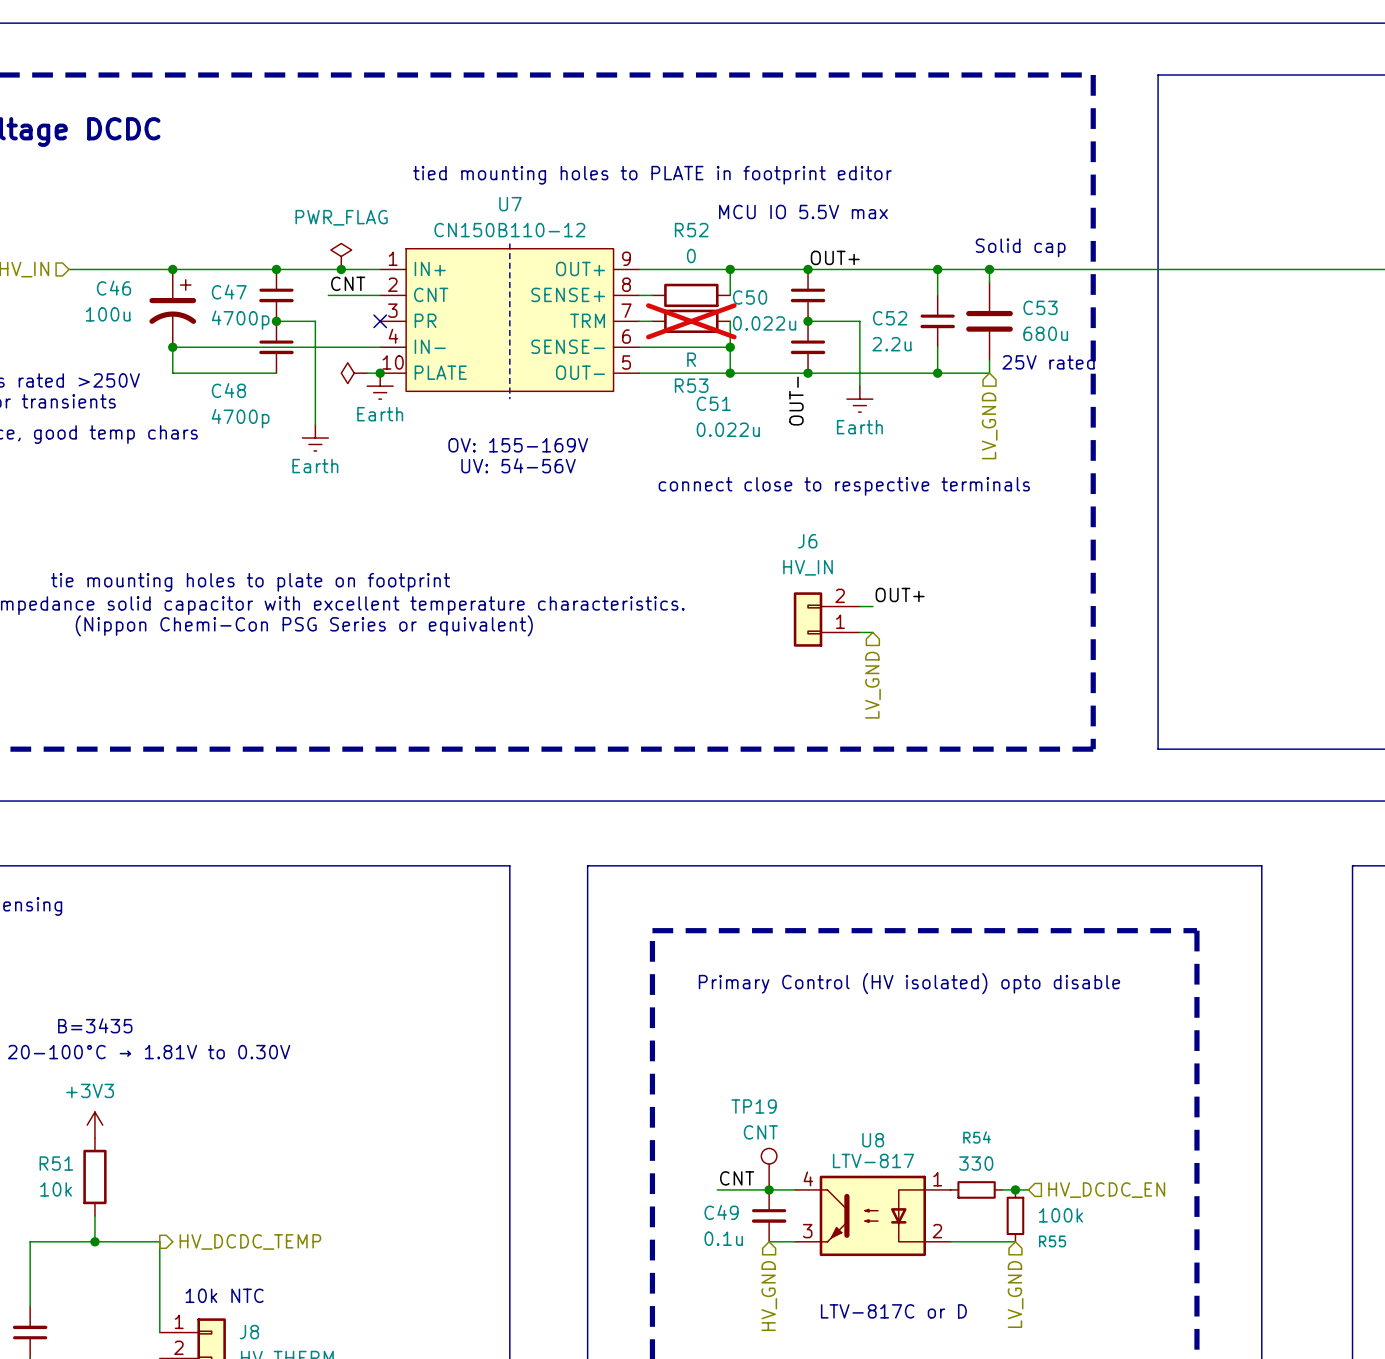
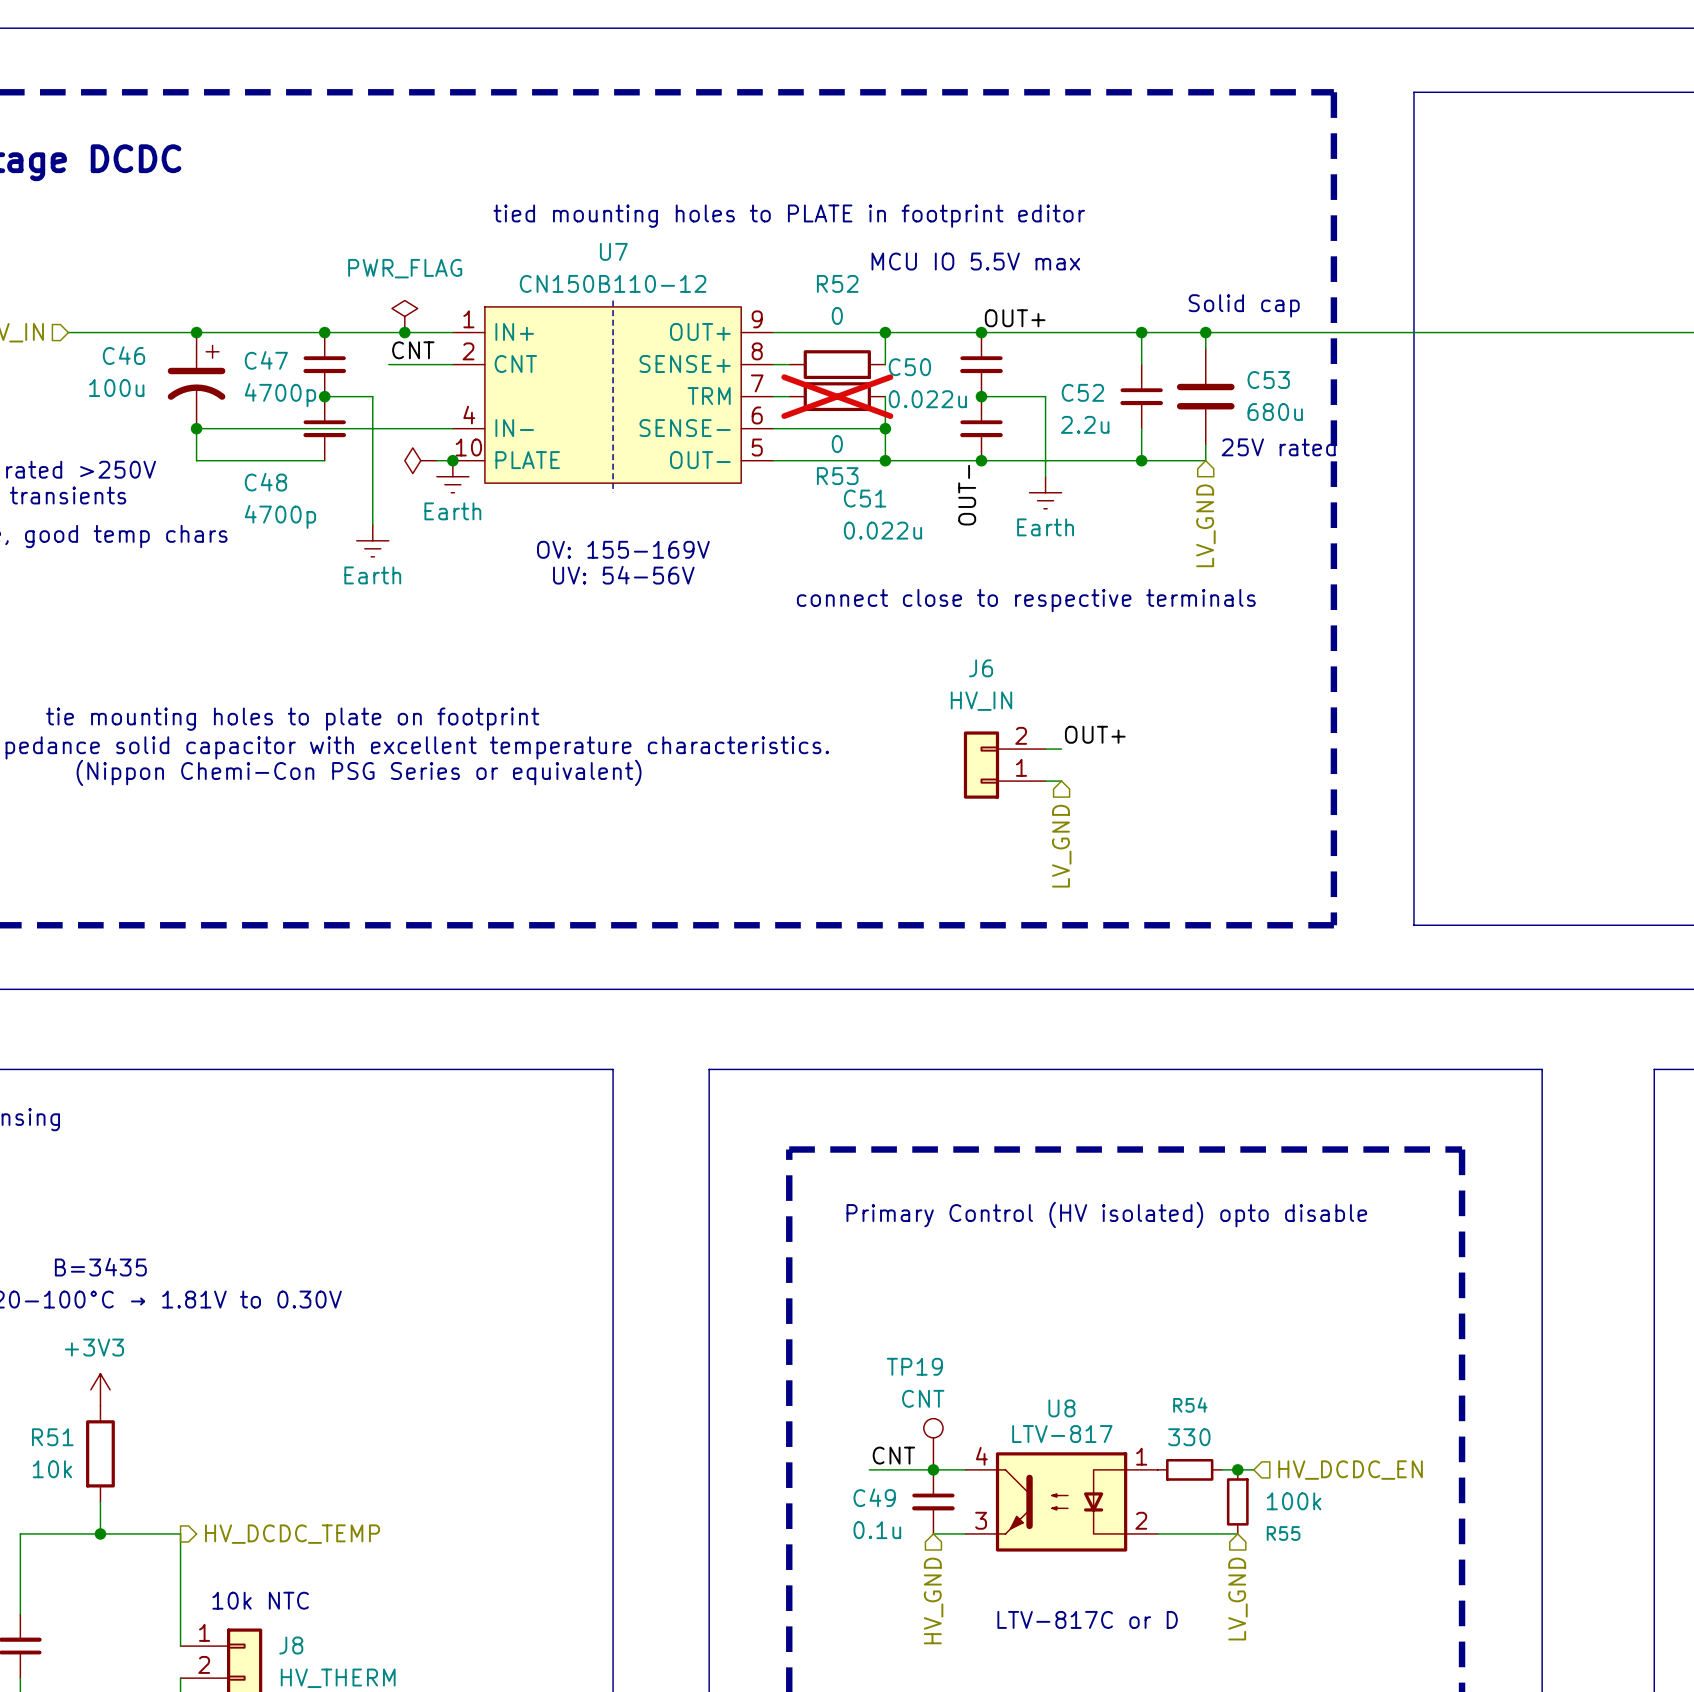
U7 symbol: [380, 248, 640, 392] -> [452, 306, 774, 484]
no-connect mark: (380, 321) -> none
R53 value: R (691, 359) -> 0 (837, 444)

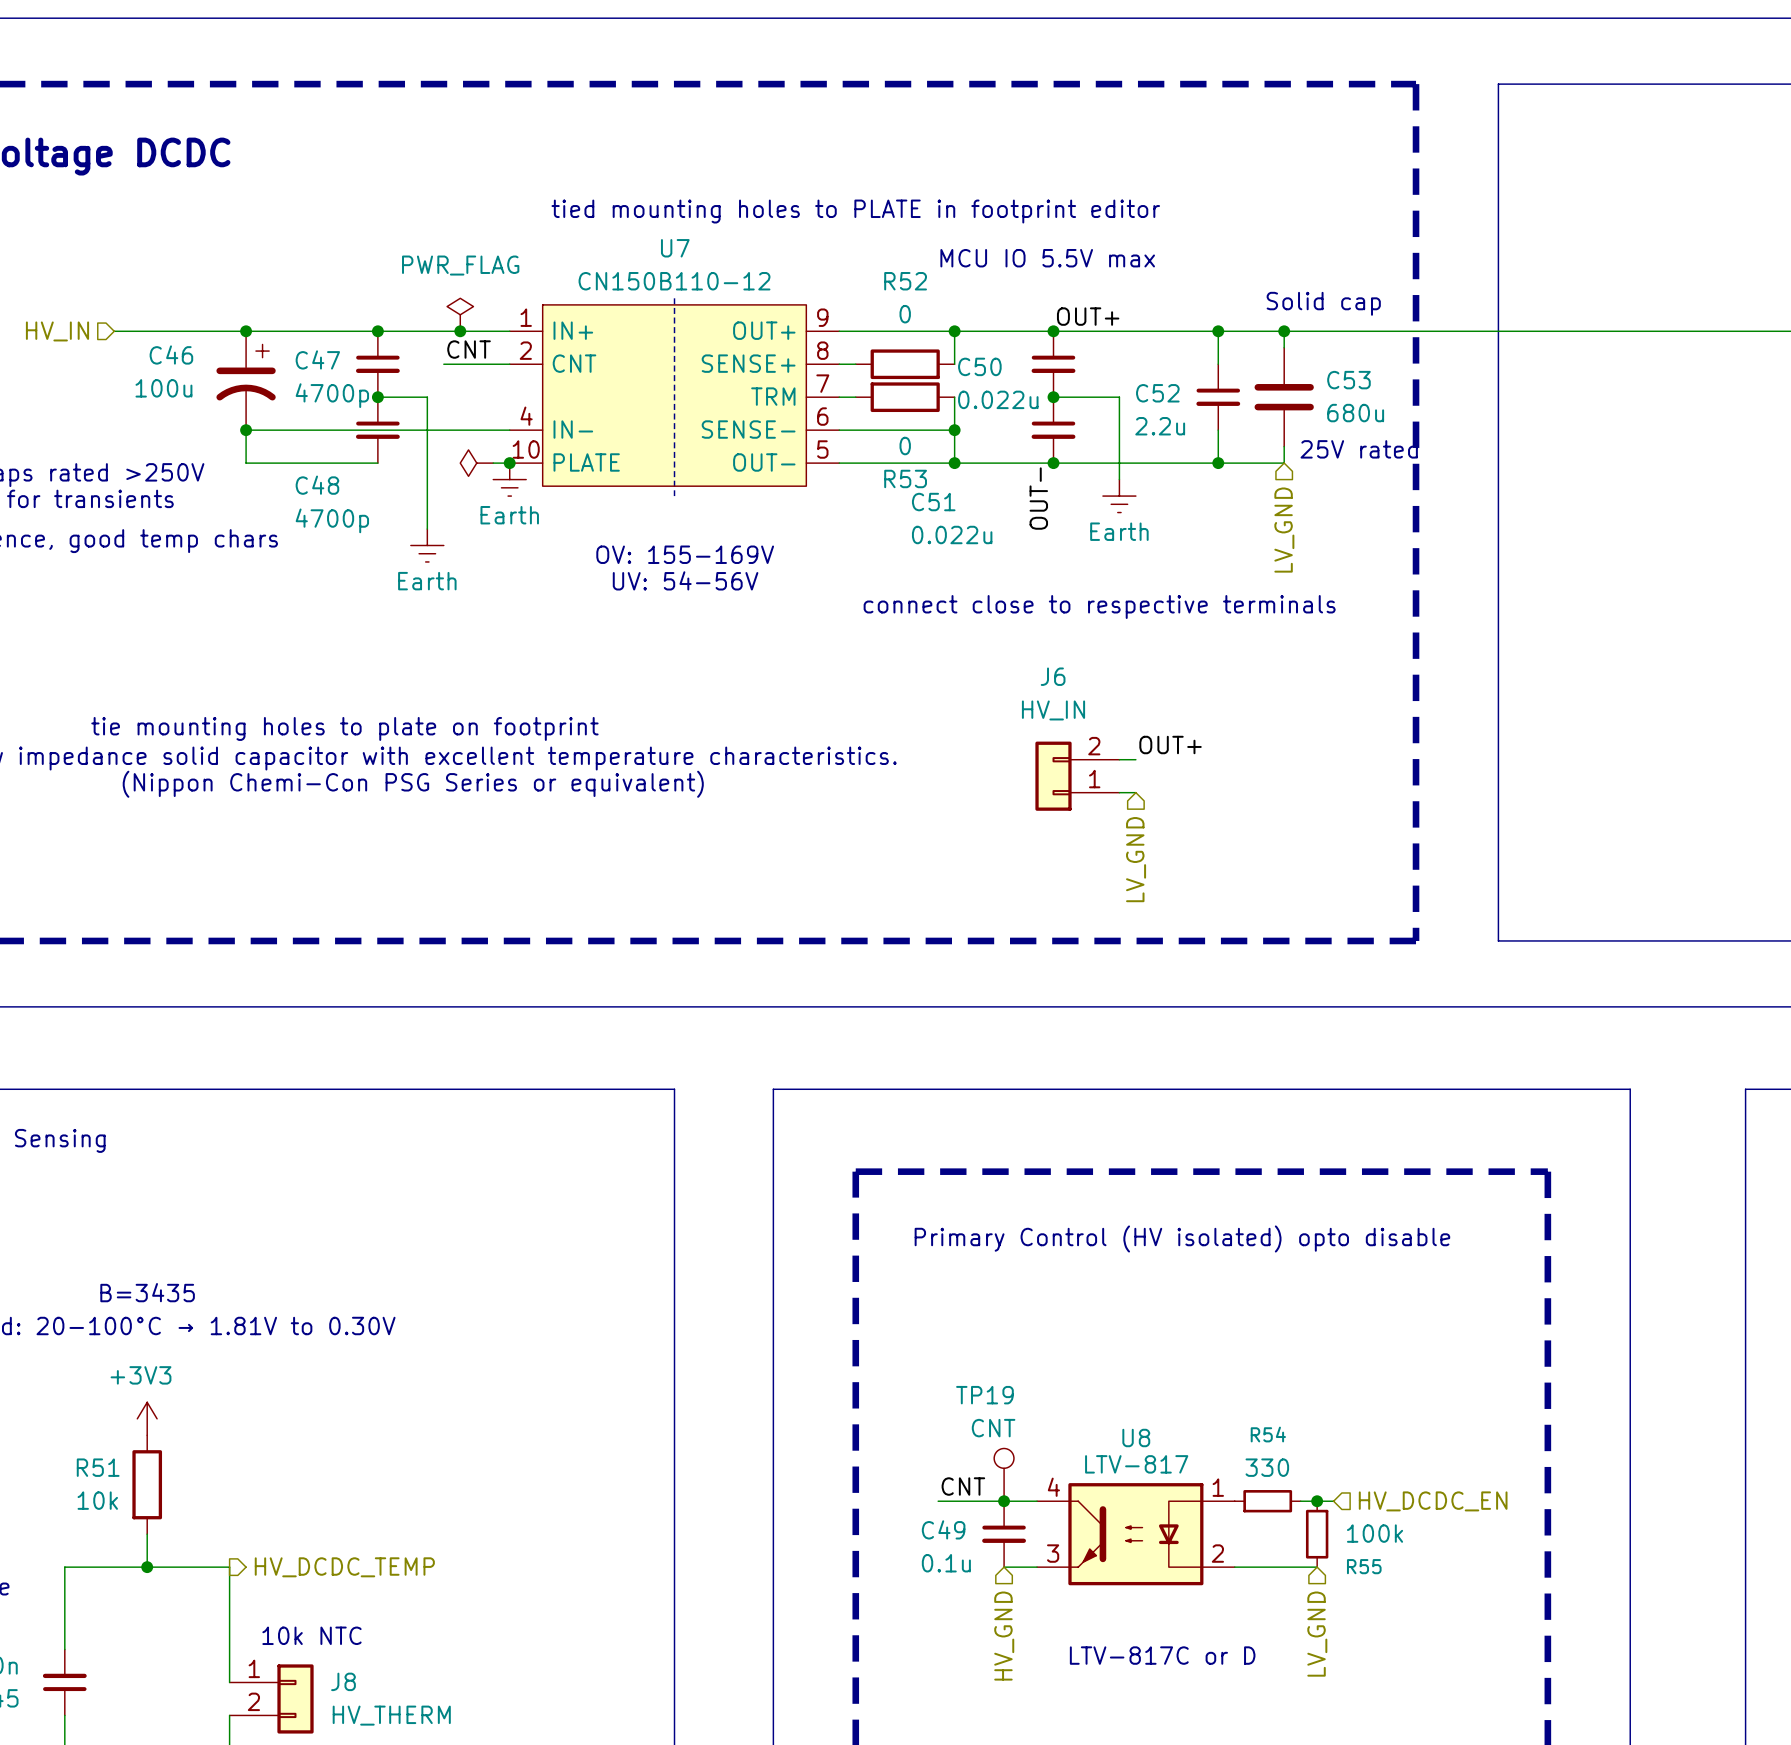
R53 do-not-place cross: (837, 396) -> none

